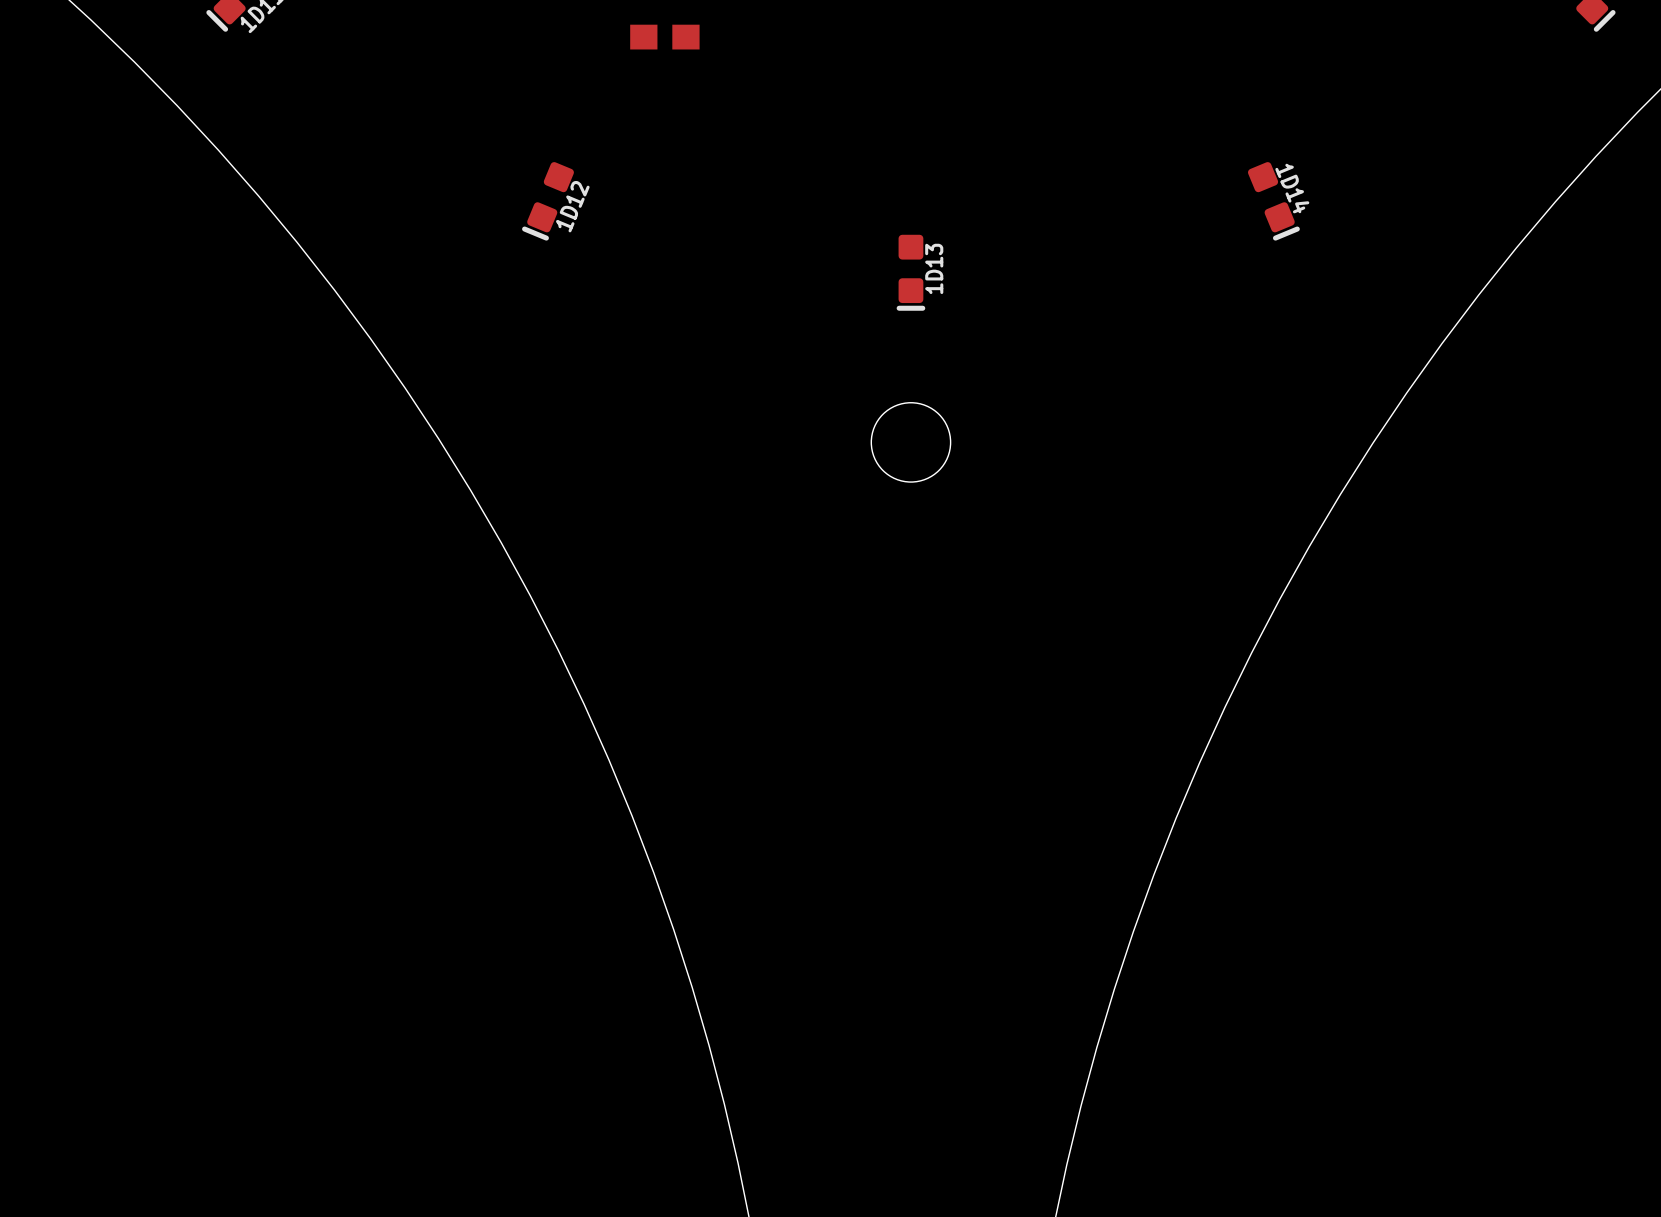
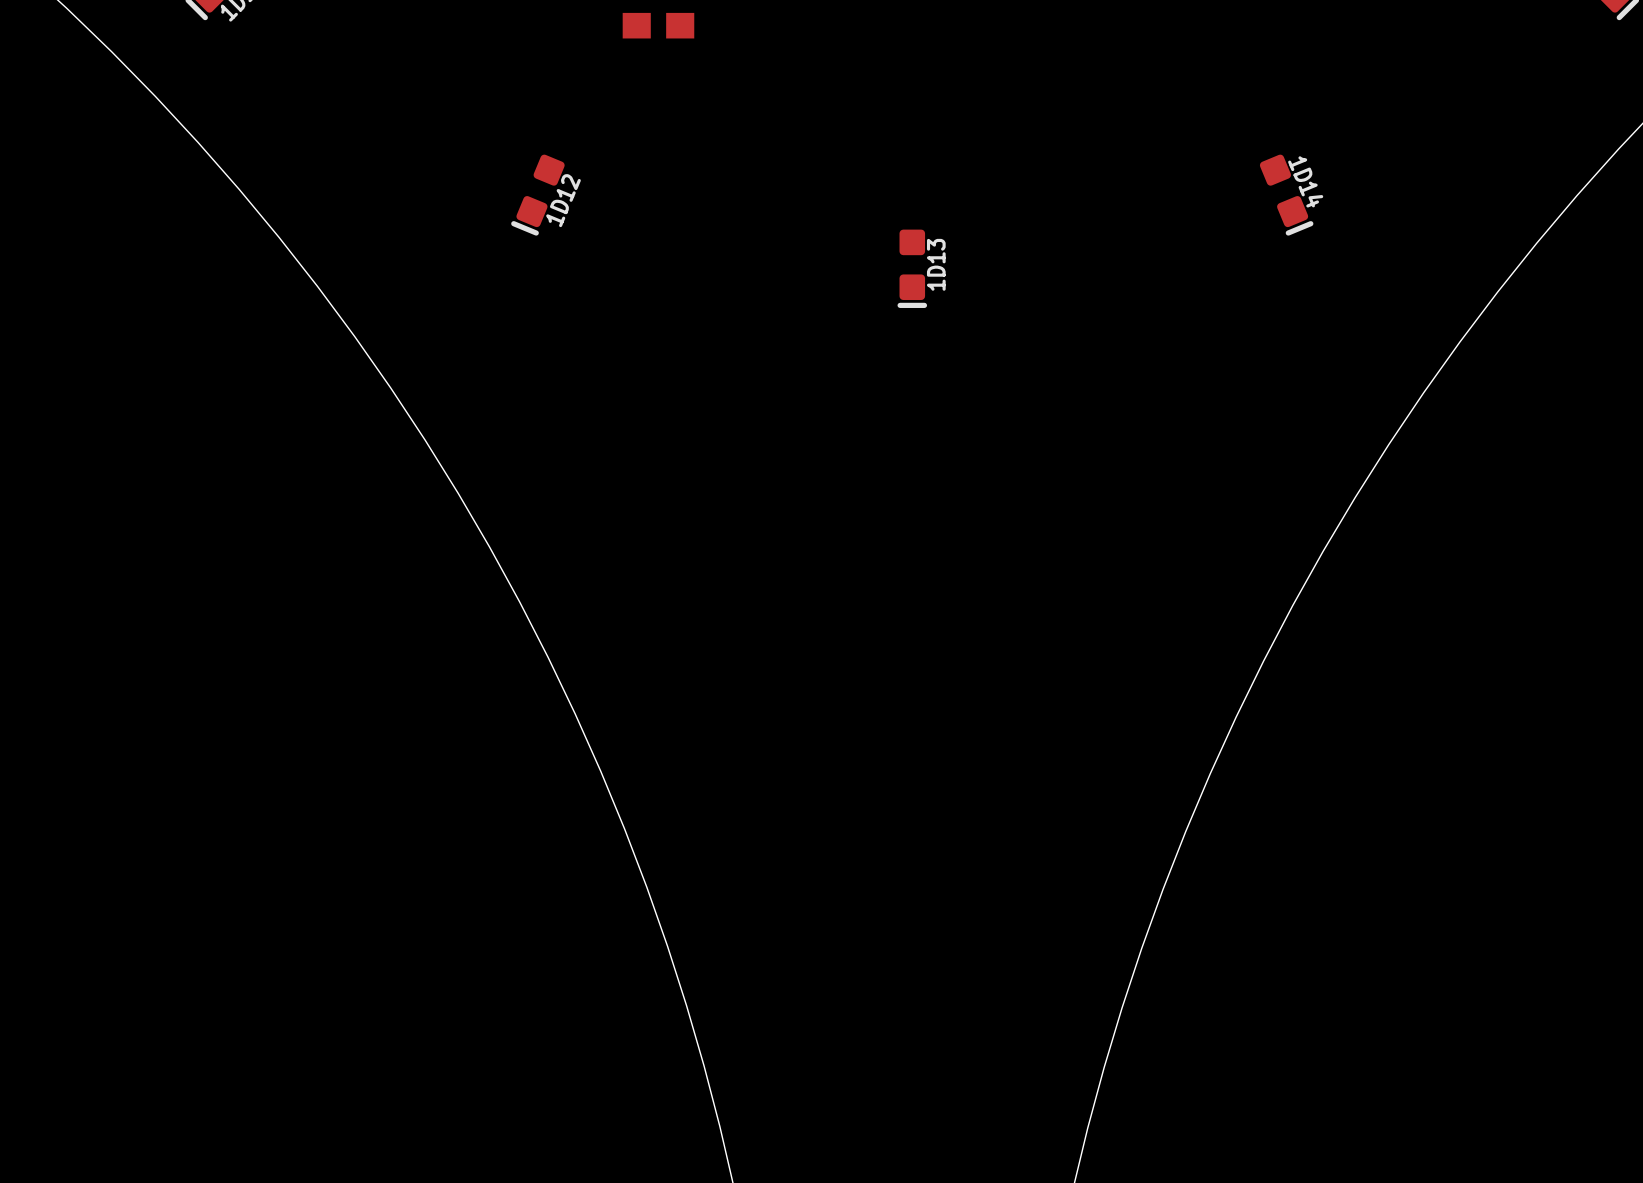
round board edge: [871, 402, 951, 483] -> none

